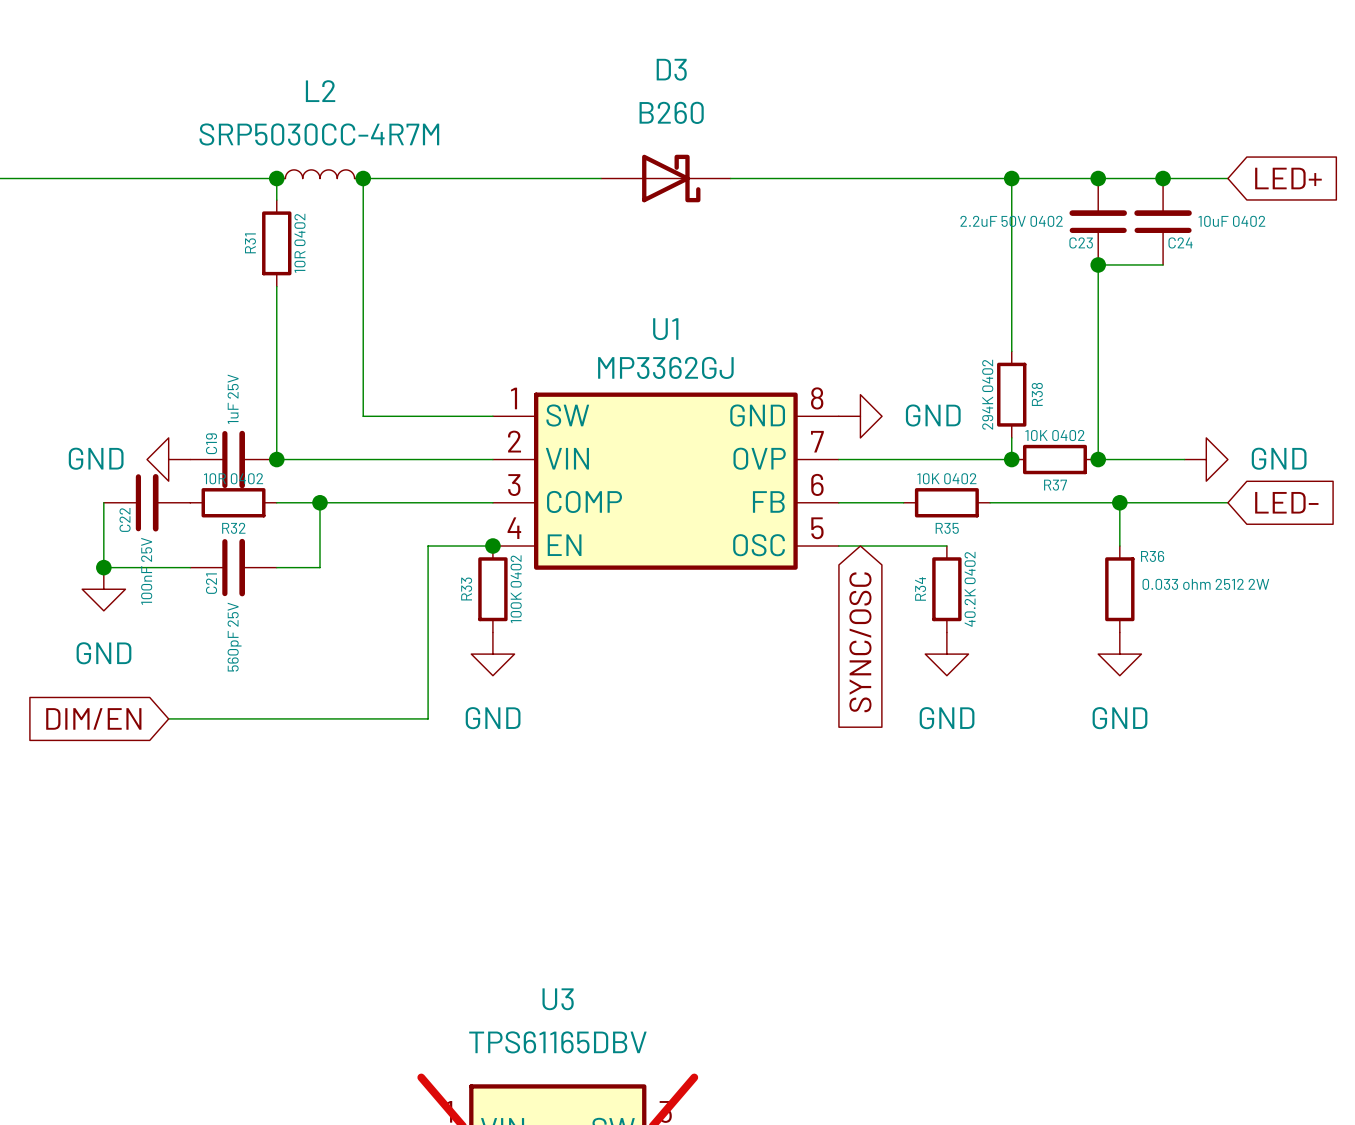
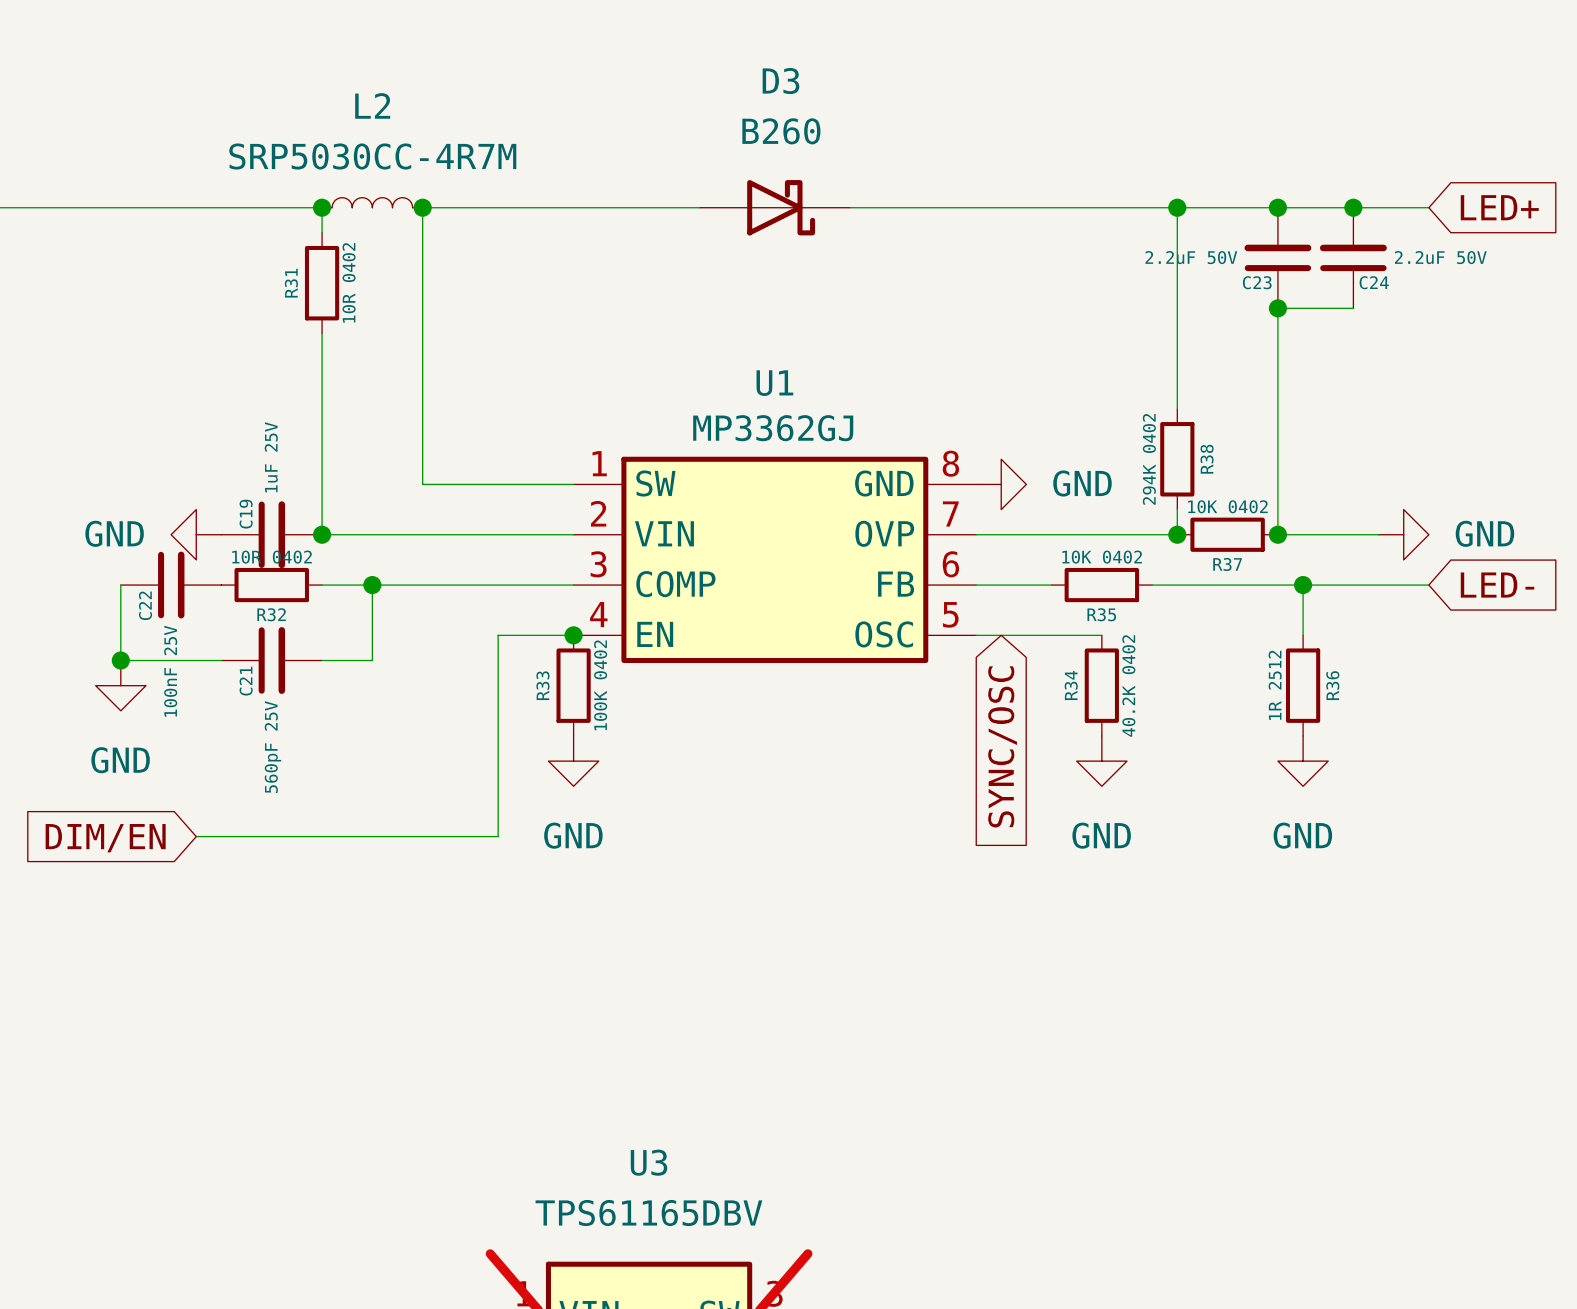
C23 value: 2.2uF 50V 0402 (1011, 221) -> 2.2uF 50V (1191, 257)
C24 value: 10uF 0402 (1231, 221) -> 2.2uF 50V (1440, 257)
R36 name rotation: 0° (1152, 556) -> 90° counterclockwise (1332, 685)
R36 value: 0.033 ohm 2512 2W (1205, 584) -> 1R 2512 (1275, 685)

